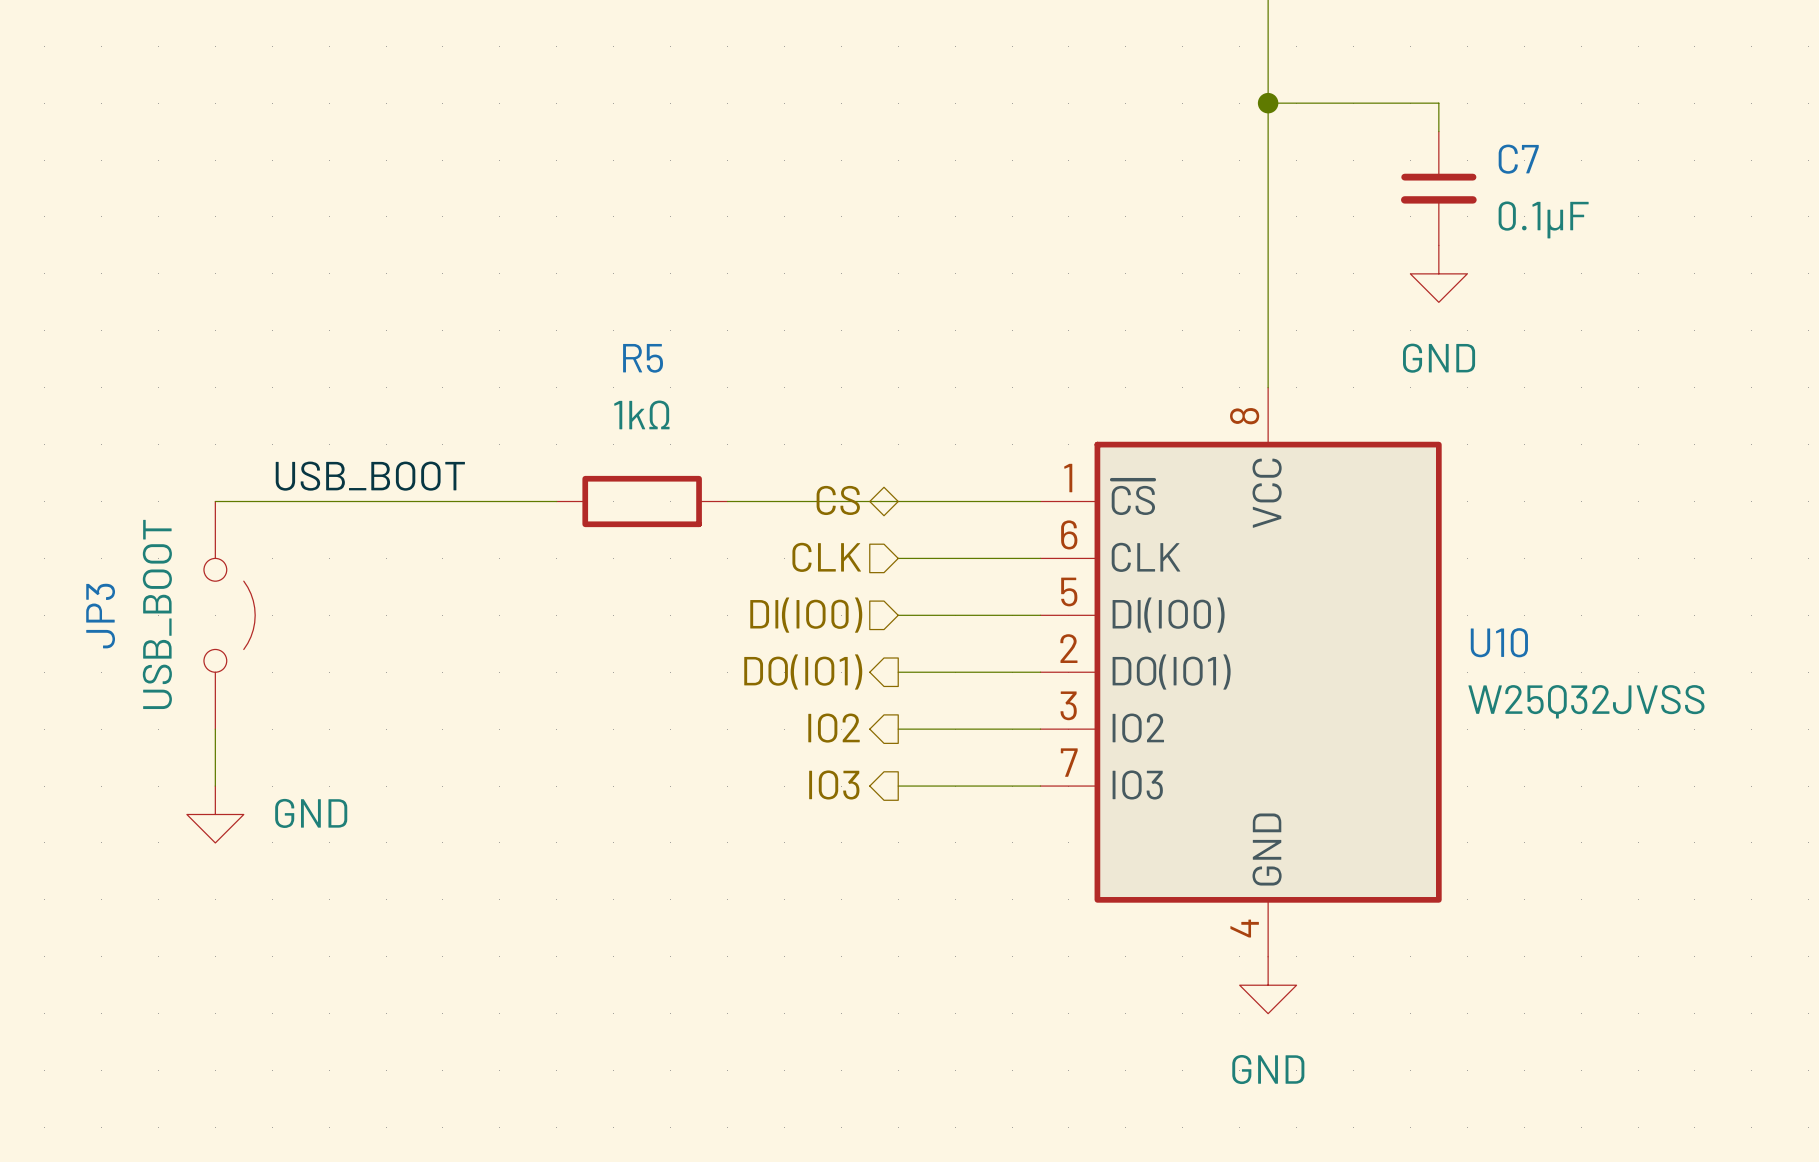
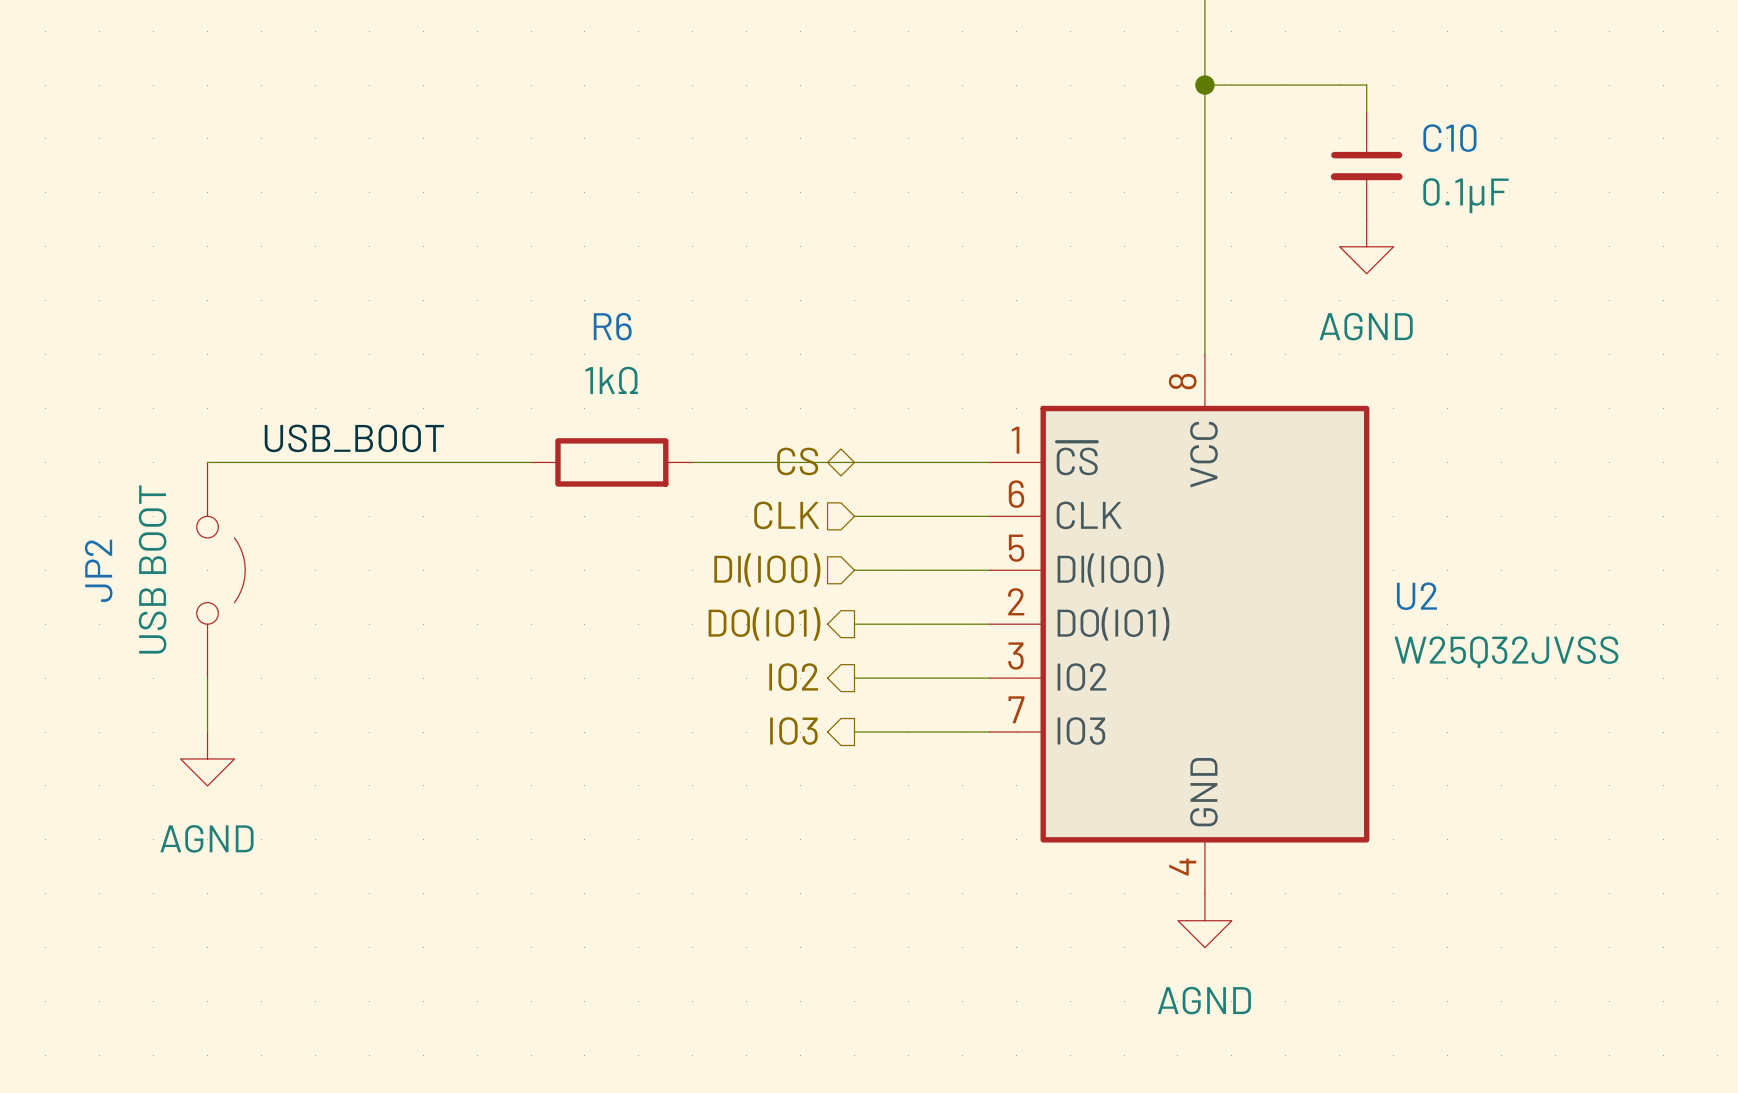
C7 name: C7 (1518, 159) -> C10 (1449, 138)
power symbol: GND (1438, 273) -> AGND (1366, 246)
R5 name: R5 (643, 358) -> R6 (612, 326)
JP3 value: USB_BOOT (157, 614) -> USB BOOT (152, 569)
JP3 name: JP3 (100, 616) -> JP2 (98, 570)
U10 name: U10 (1499, 642) -> U2 (1416, 596)
power symbol: GND (215, 814) -> AGND (207, 758)
power symbol: GND (1268, 985) -> AGND (1204, 920)

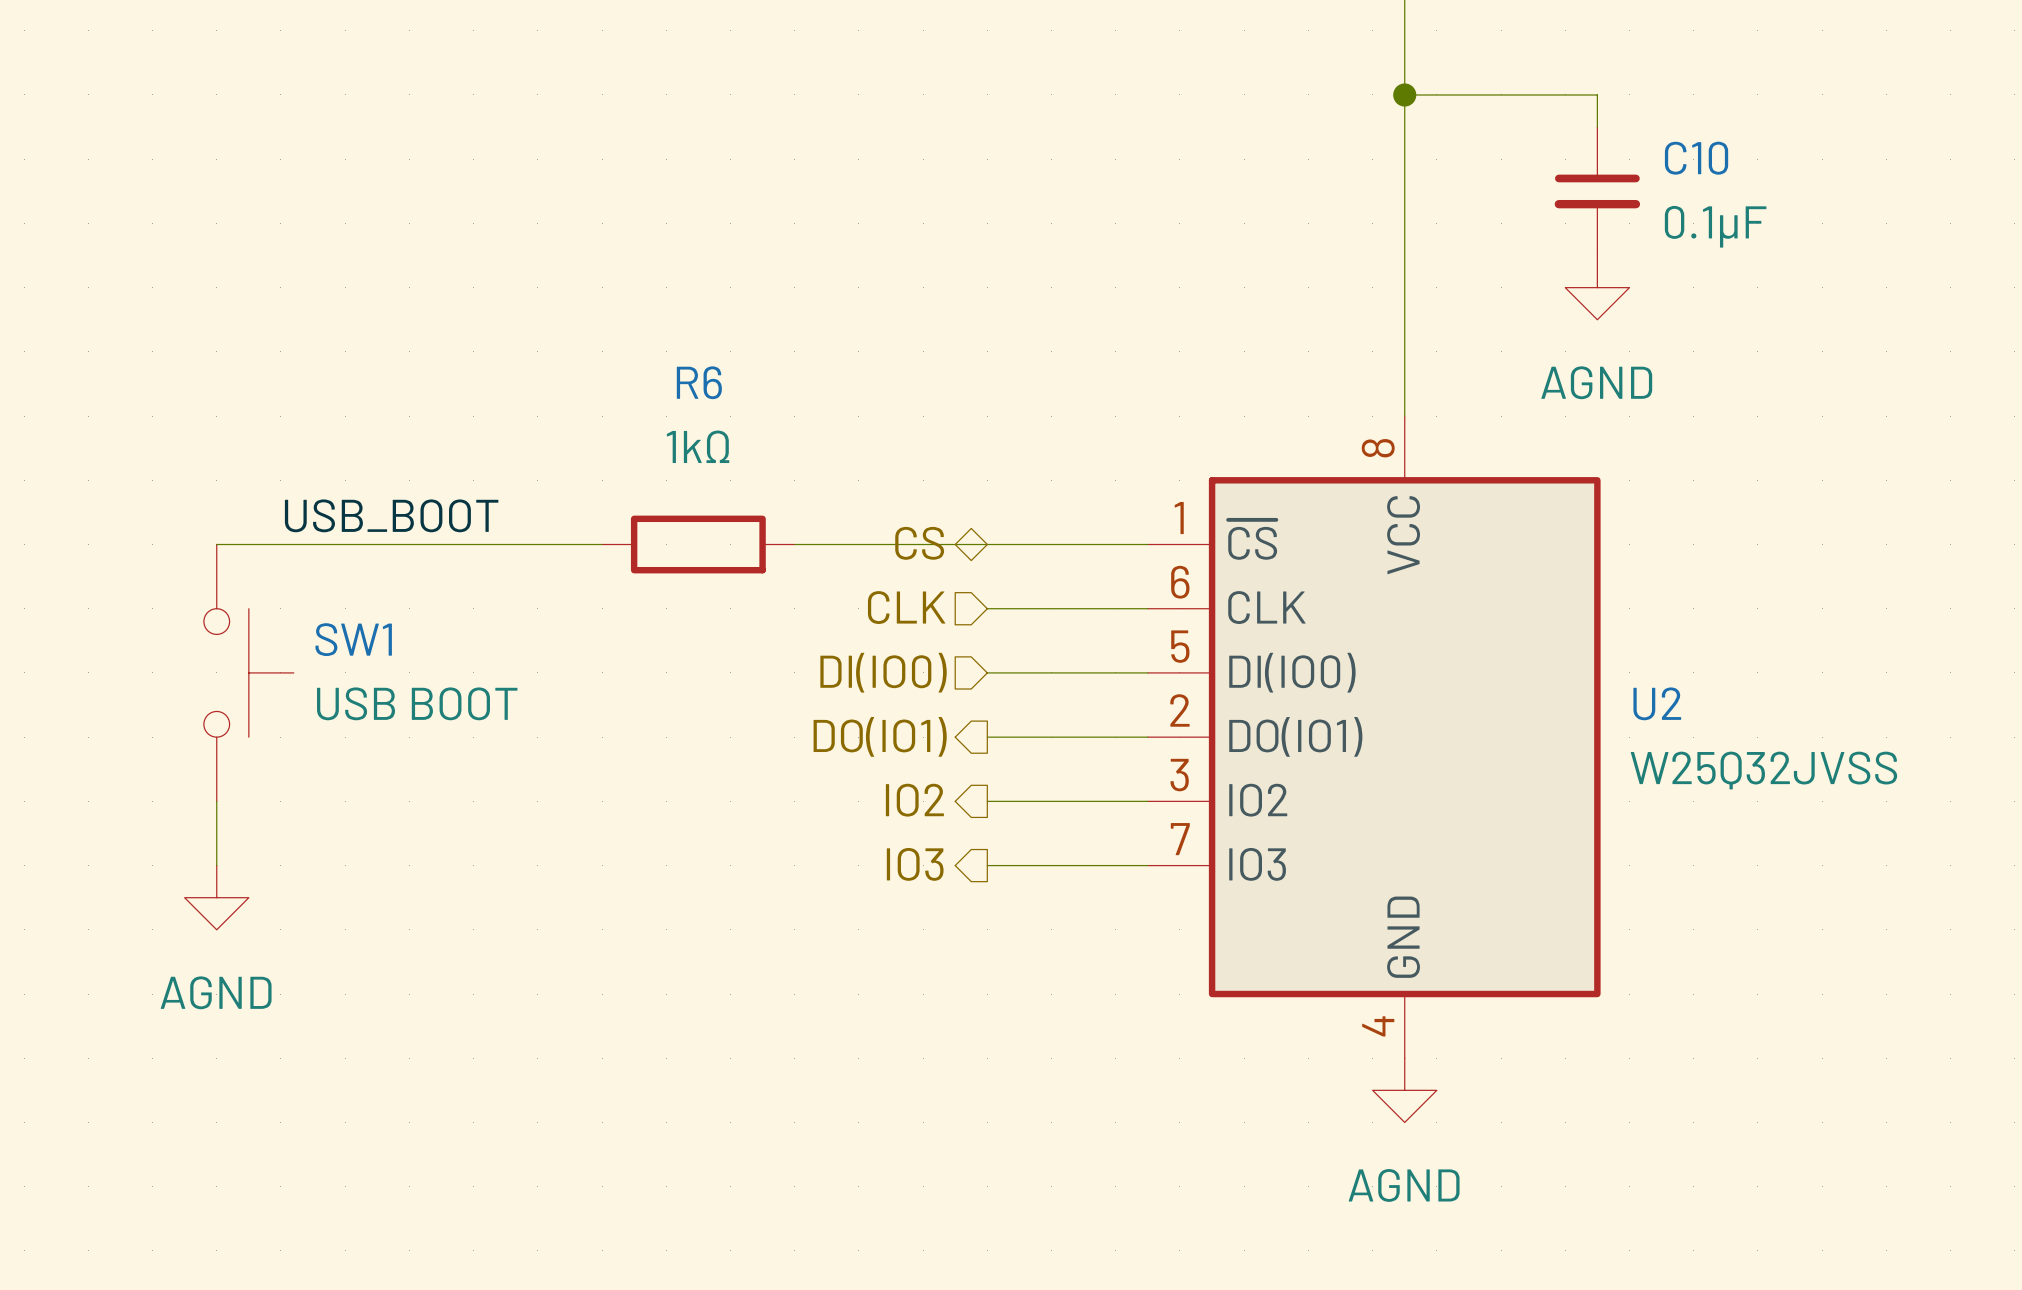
JP2: USB BOOT (221, 570) -> none
SW1: none -> USB BOOT (248, 672)

